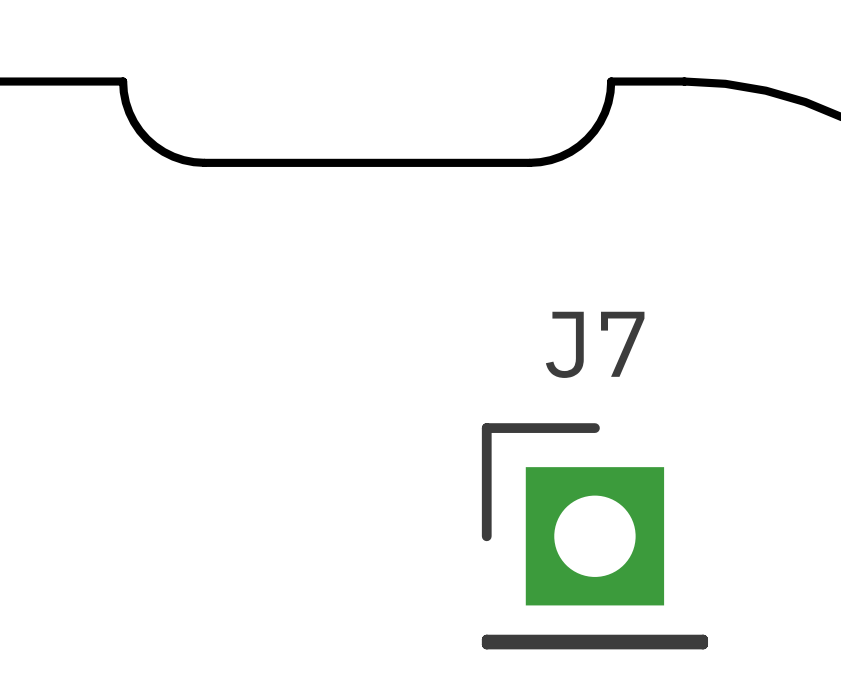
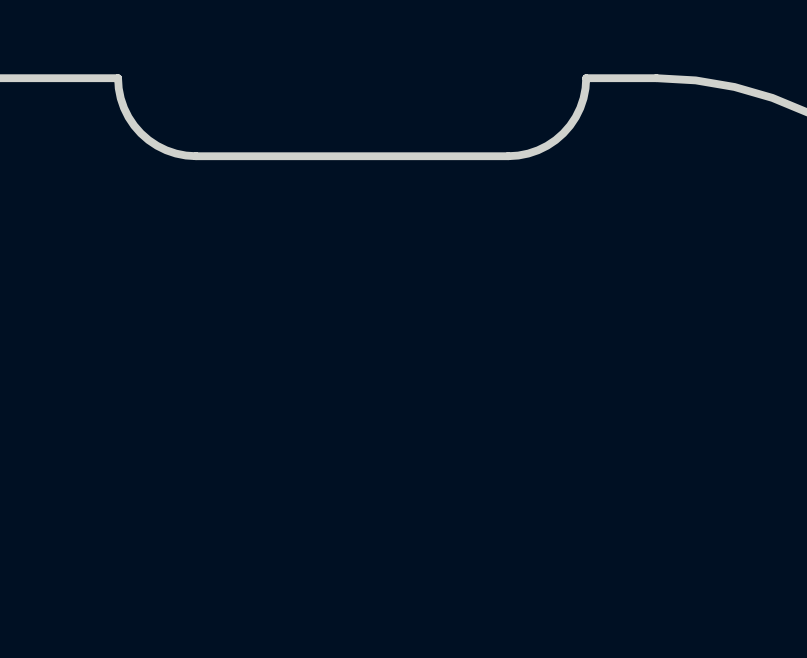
J7: (594, 536) -> none

